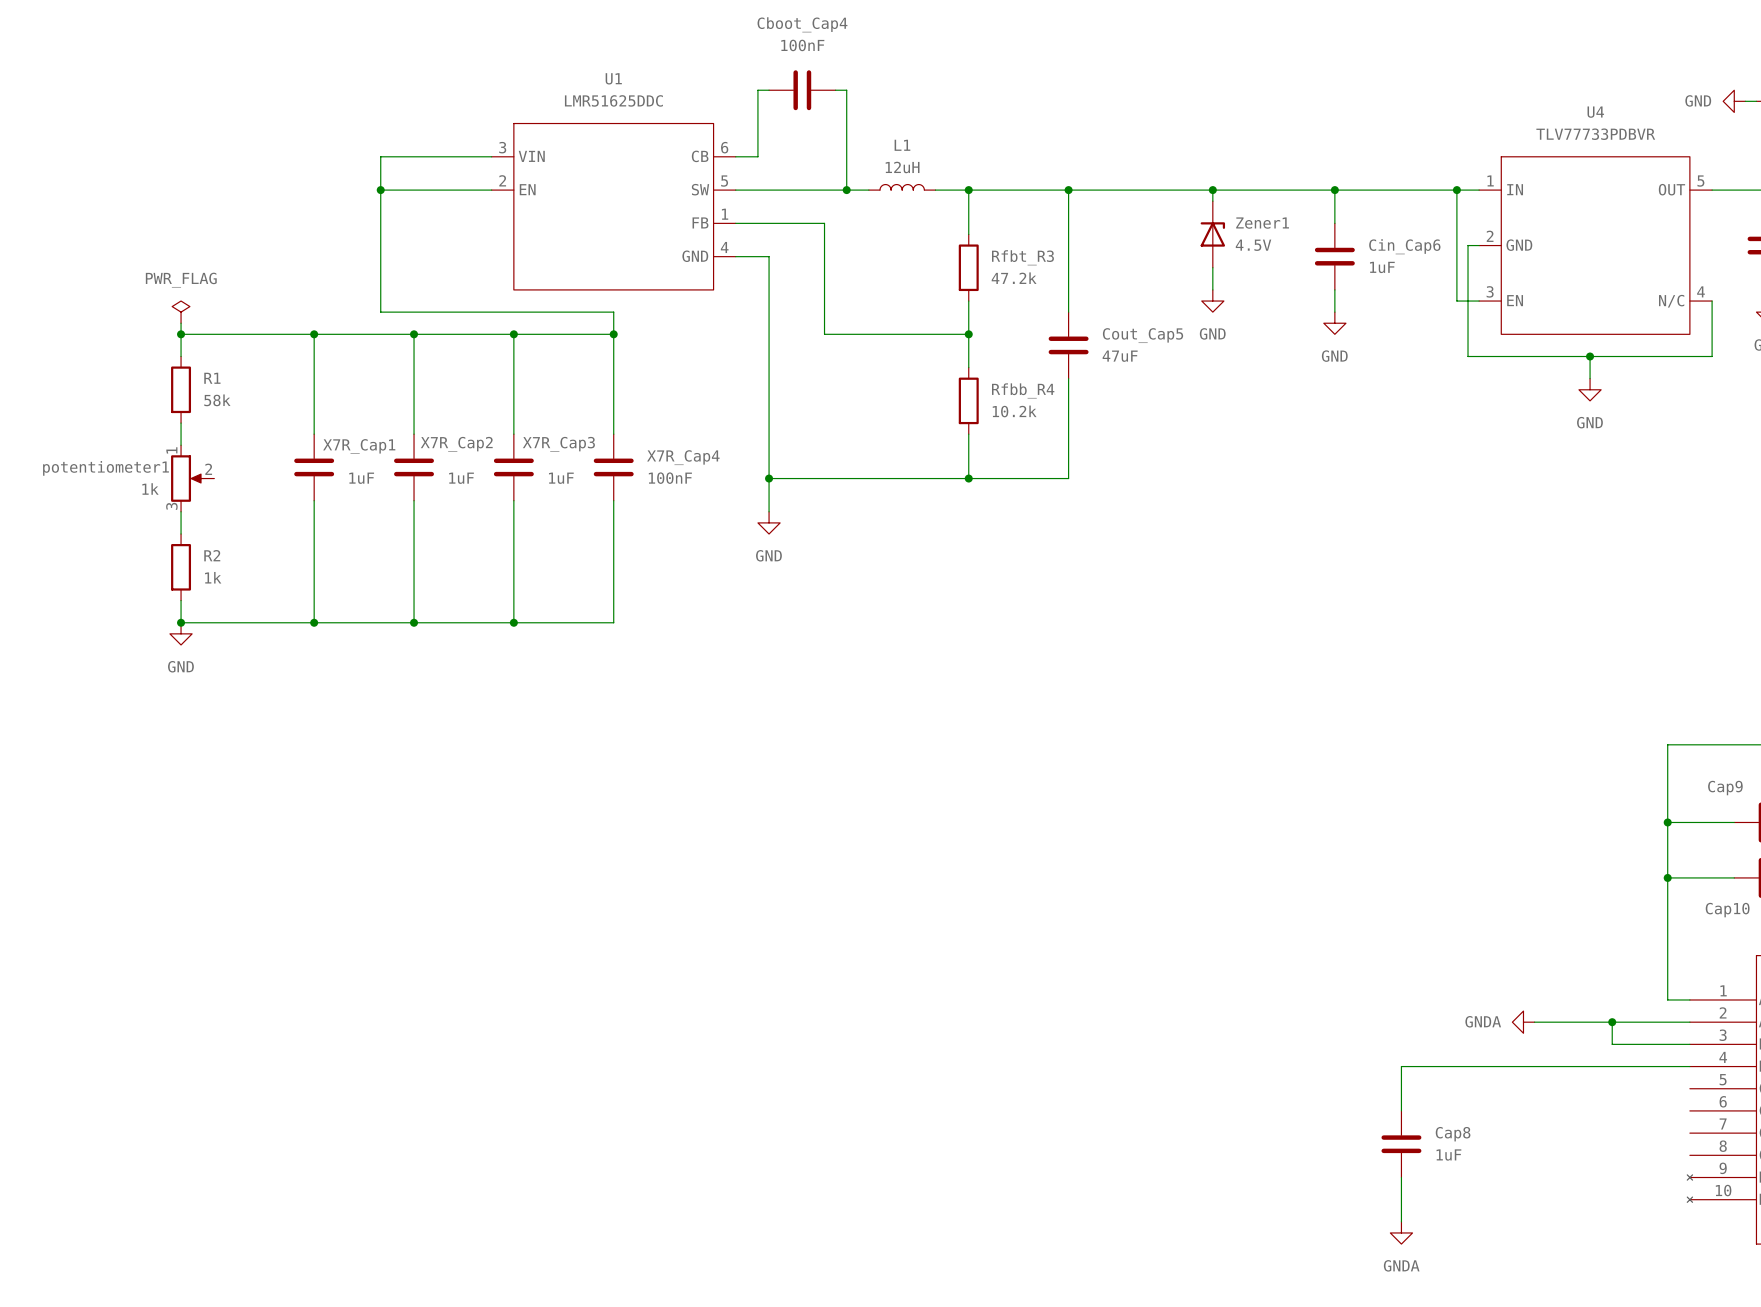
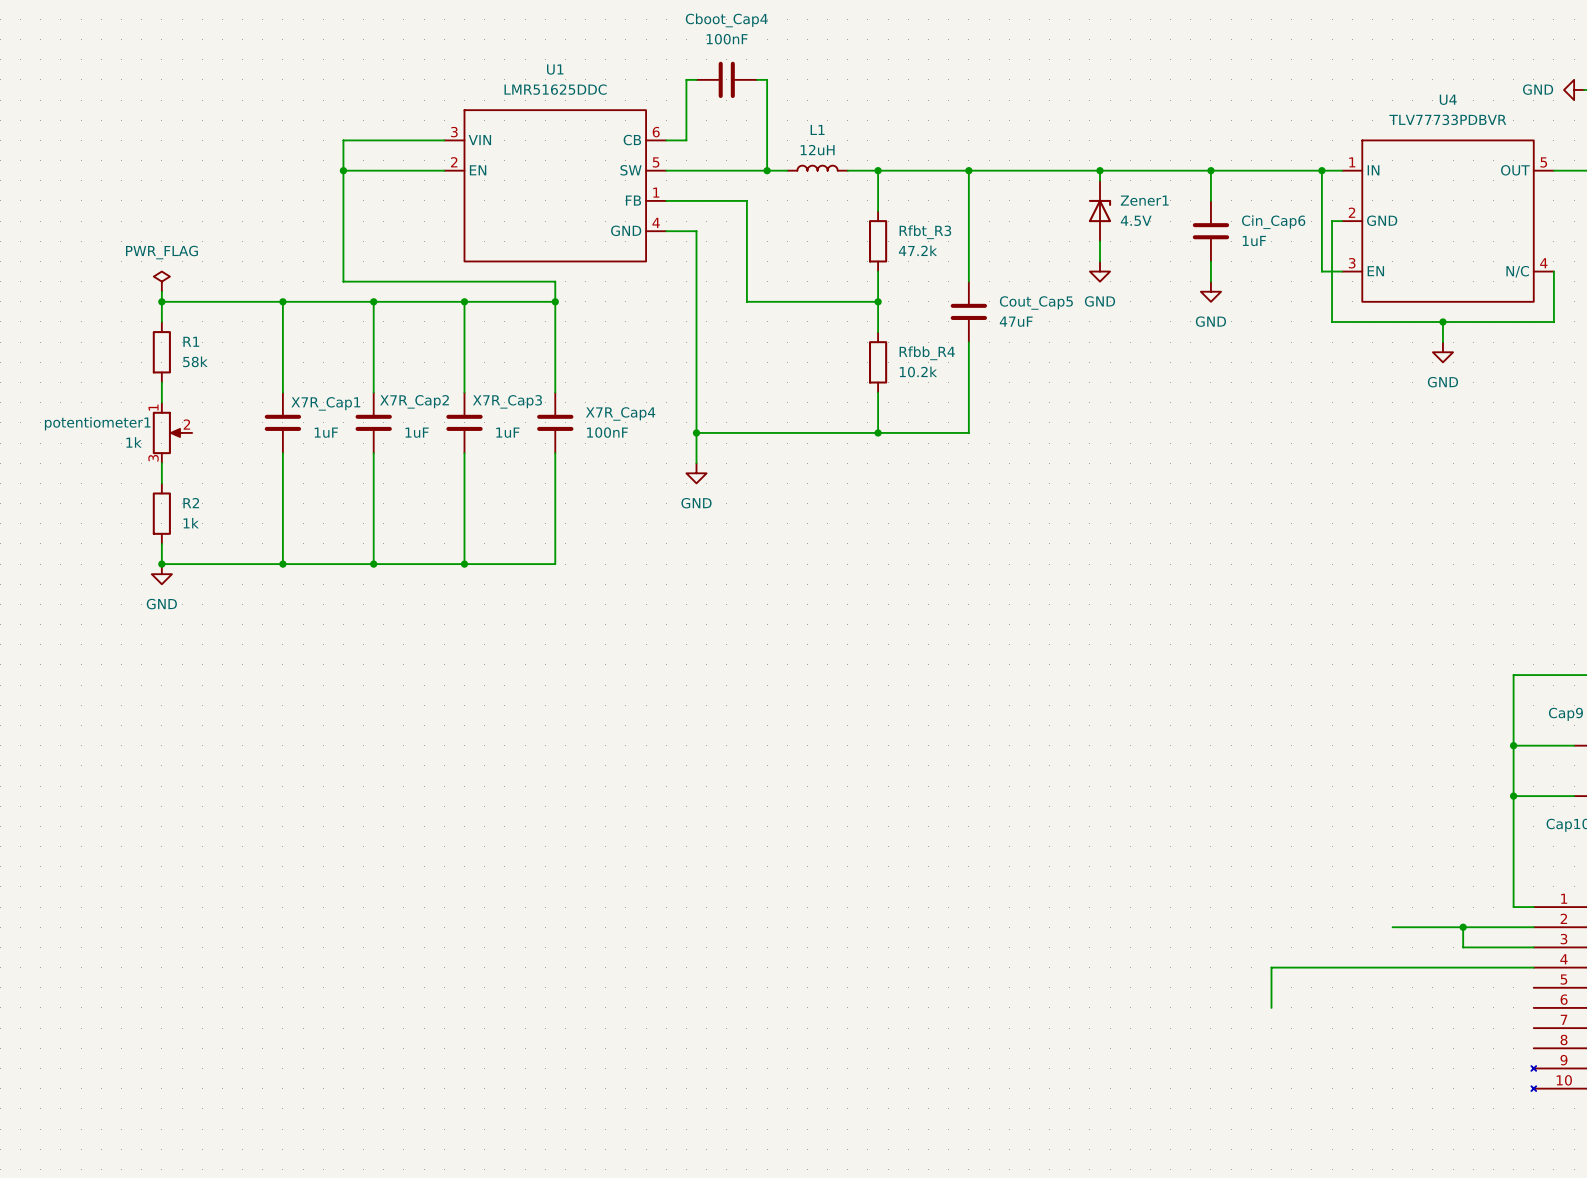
power symbol: GNDA (1523, 1022) -> none
Cap8: 1uF (1401, 1144) -> none
wire: (1401, 1177) (1401, 1221) -> none
power symbol: GNDA (1401, 1232) -> none

